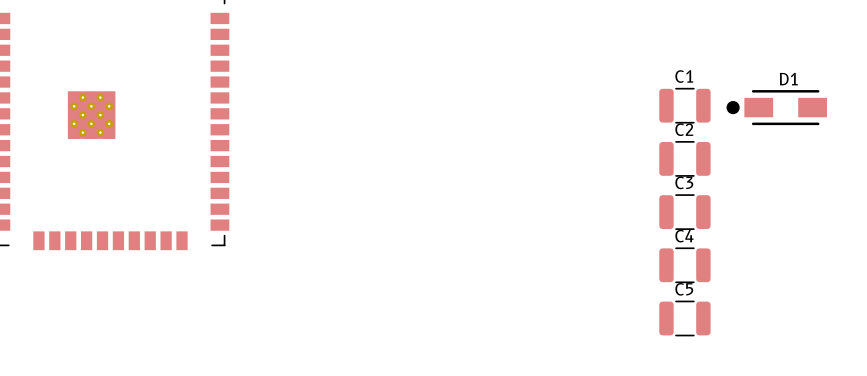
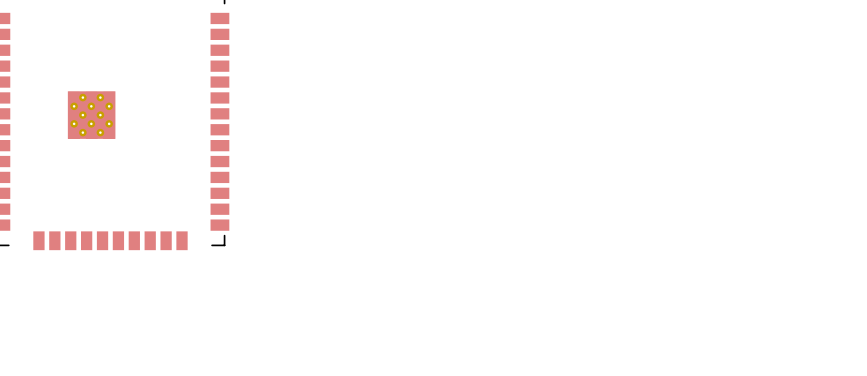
C1: (684, 105) -> none
D1: (776, 107) -> none
C2: (684, 158) -> none
C3: (684, 212) -> none
C4: (684, 265) -> none
C5: (684, 318) -> none

